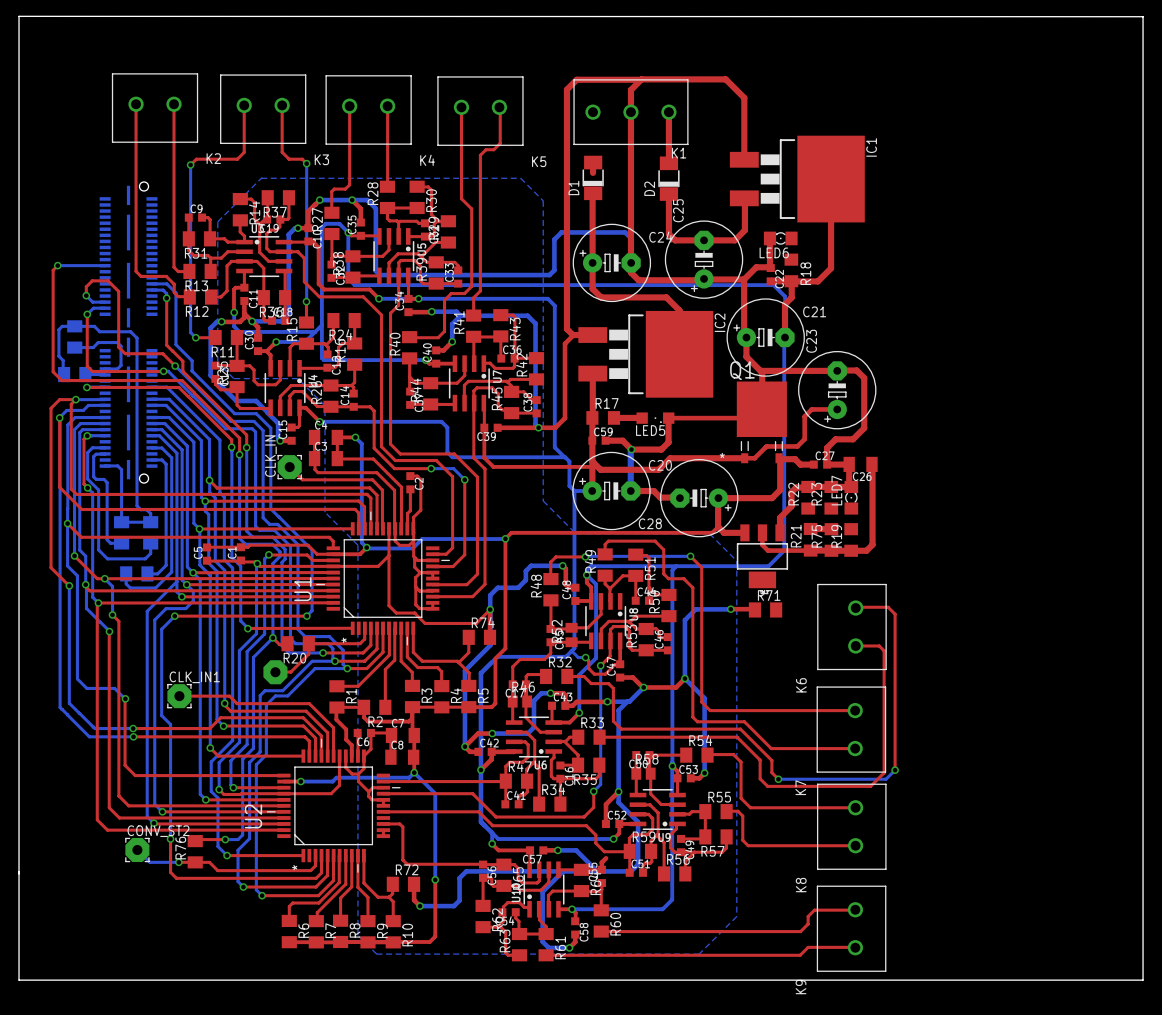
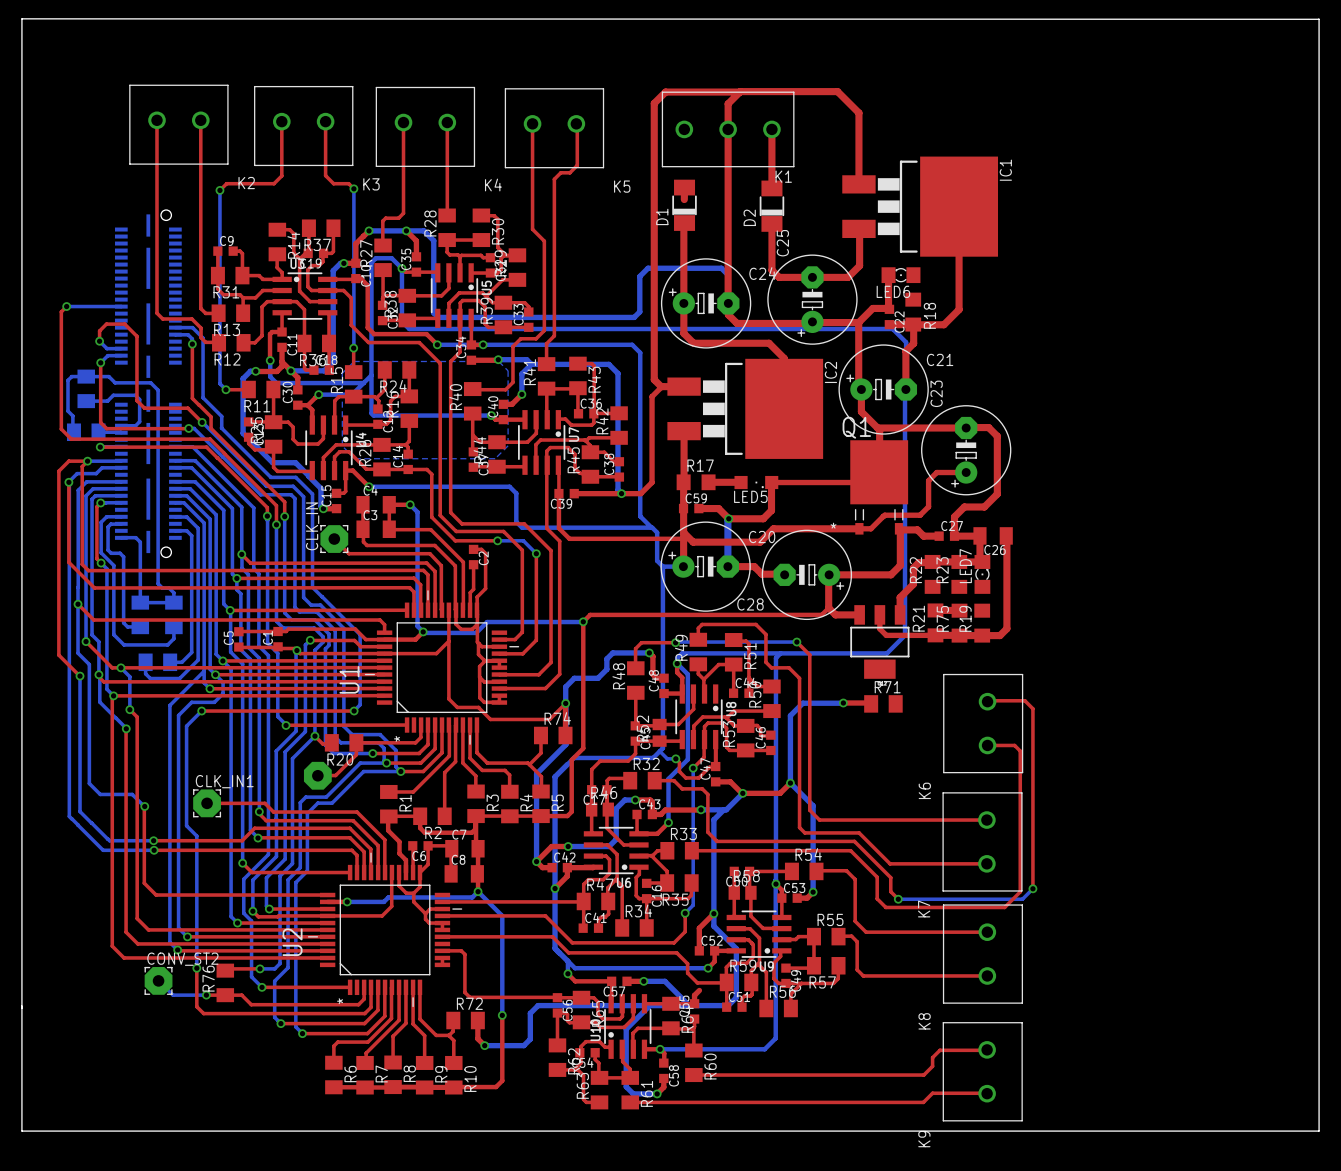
bottom zone outline: (261, 178) (520, 178) (543, 200) (543, 501) (576, 533) (709, 533) (736, 560) (736, 916) (699, 954) (376, 954) (357, 935) (357, 545) (324, 512) (324, 405) (297, 378) (233, 378) (217, 362) (217, 221) (261, 178) -> none
bottom zone outline: none -> (353, 361) (498, 361) (508, 370) (508, 445) (495, 458) (355, 458) (342, 446) (342, 373) (353, 361)

